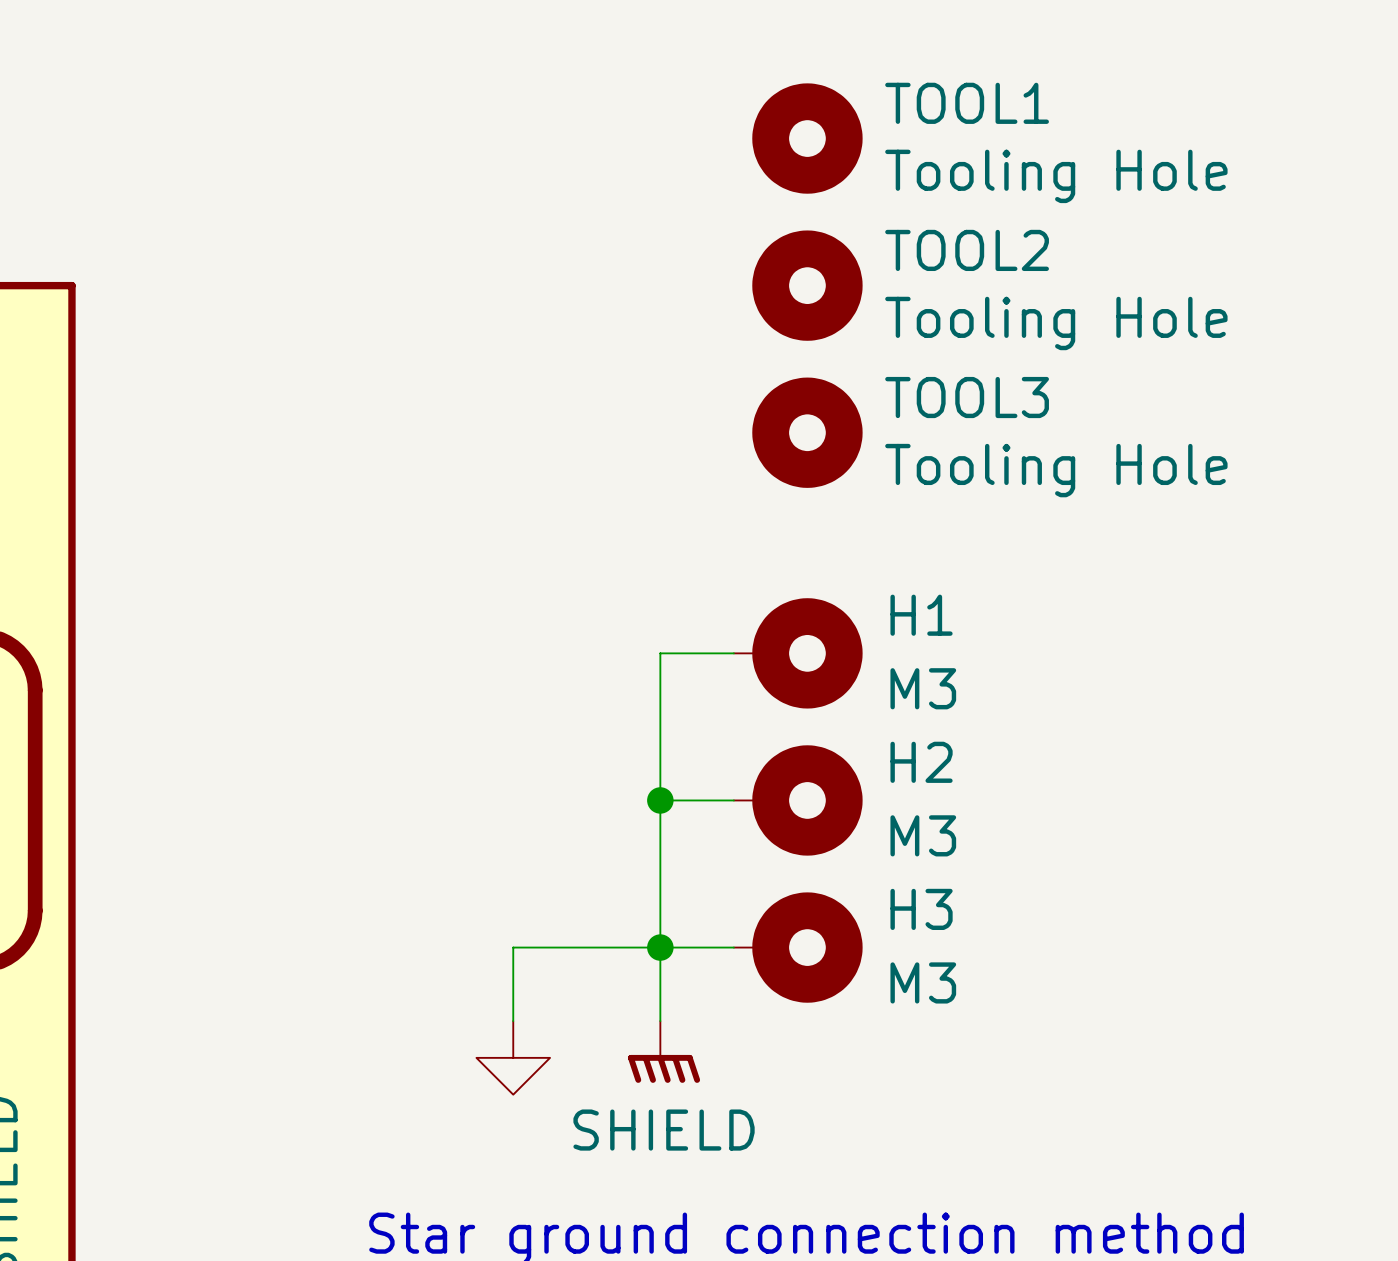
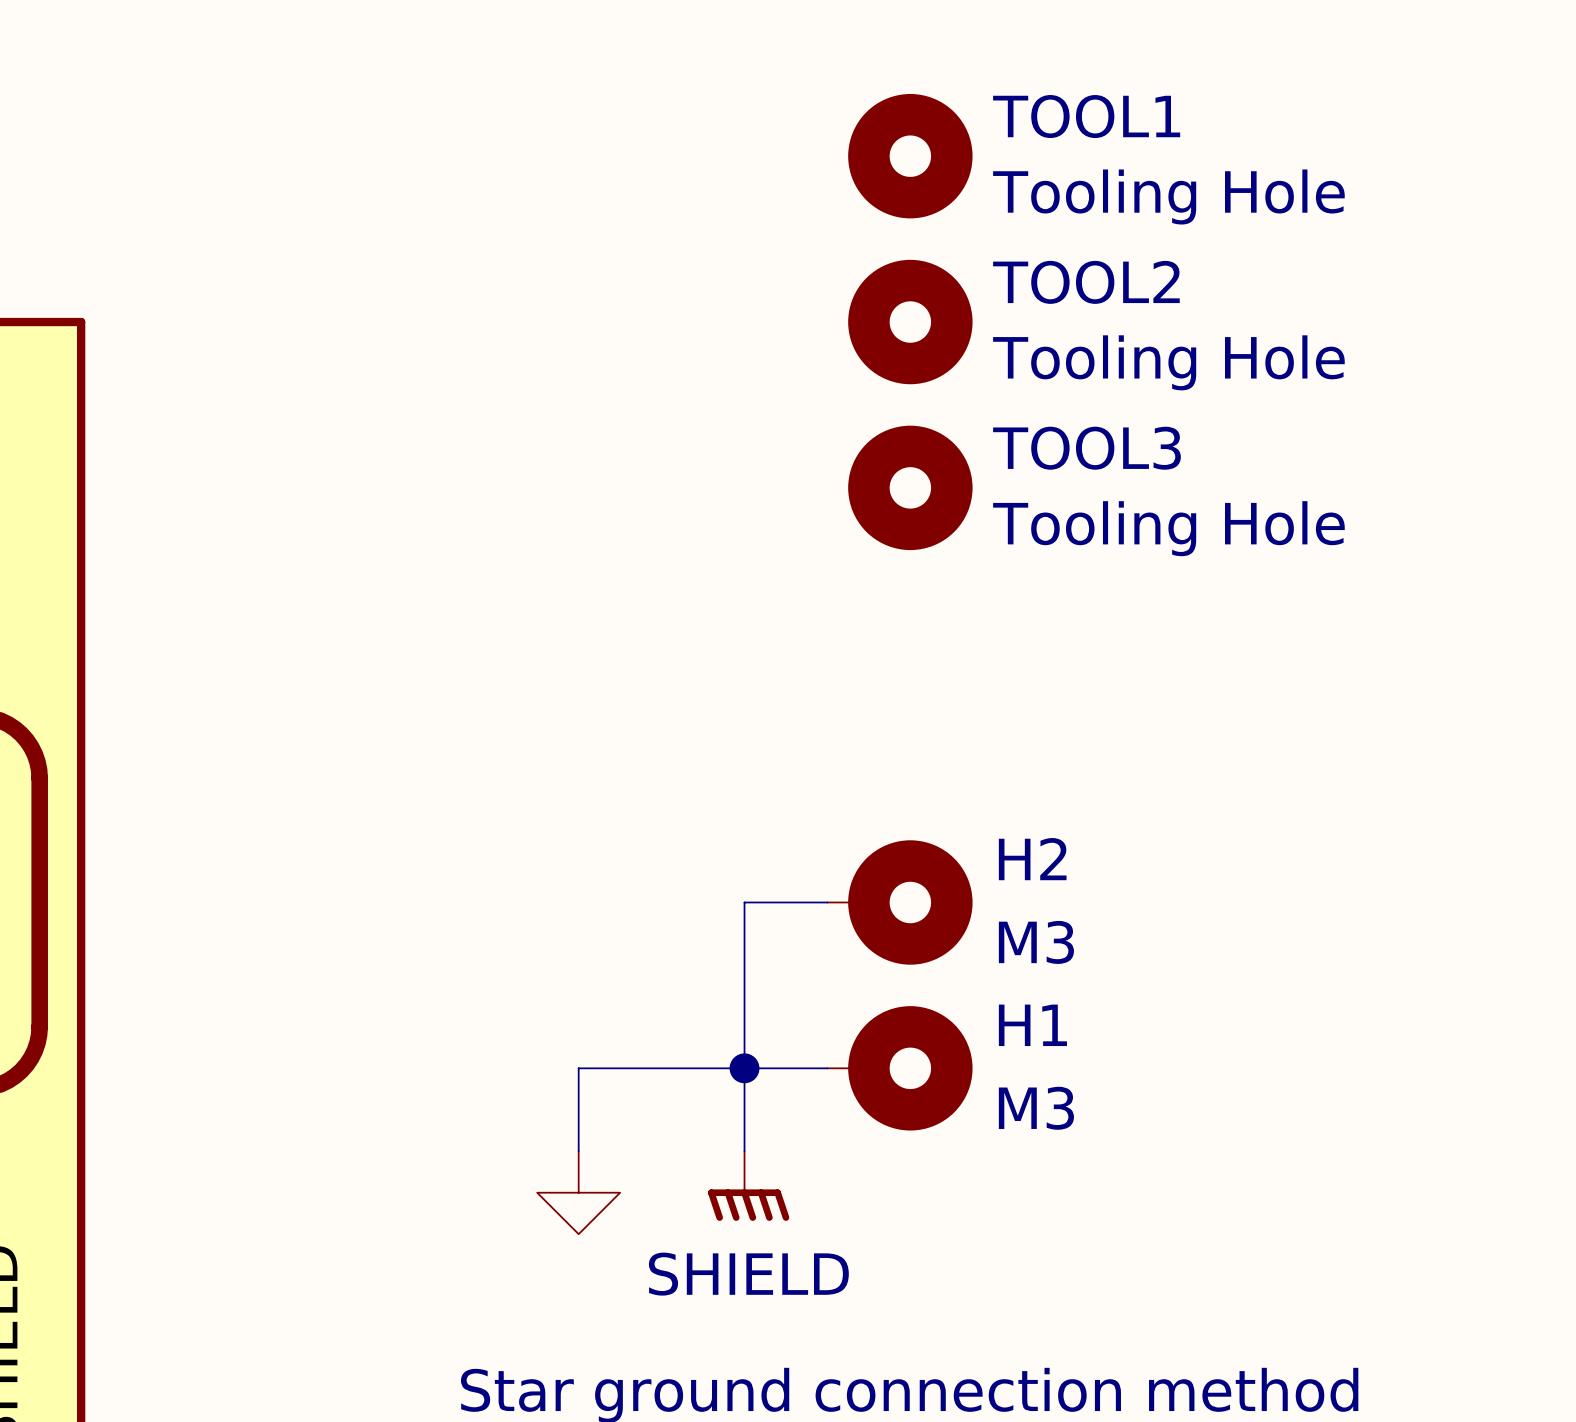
wire: (733, 653) (660, 653) (660, 800) -> none
H1: M3 (798, 653) -> none
junction: (660, 800) -> none
H3 name: H3 (921, 909) -> H1 (1032, 1025)

